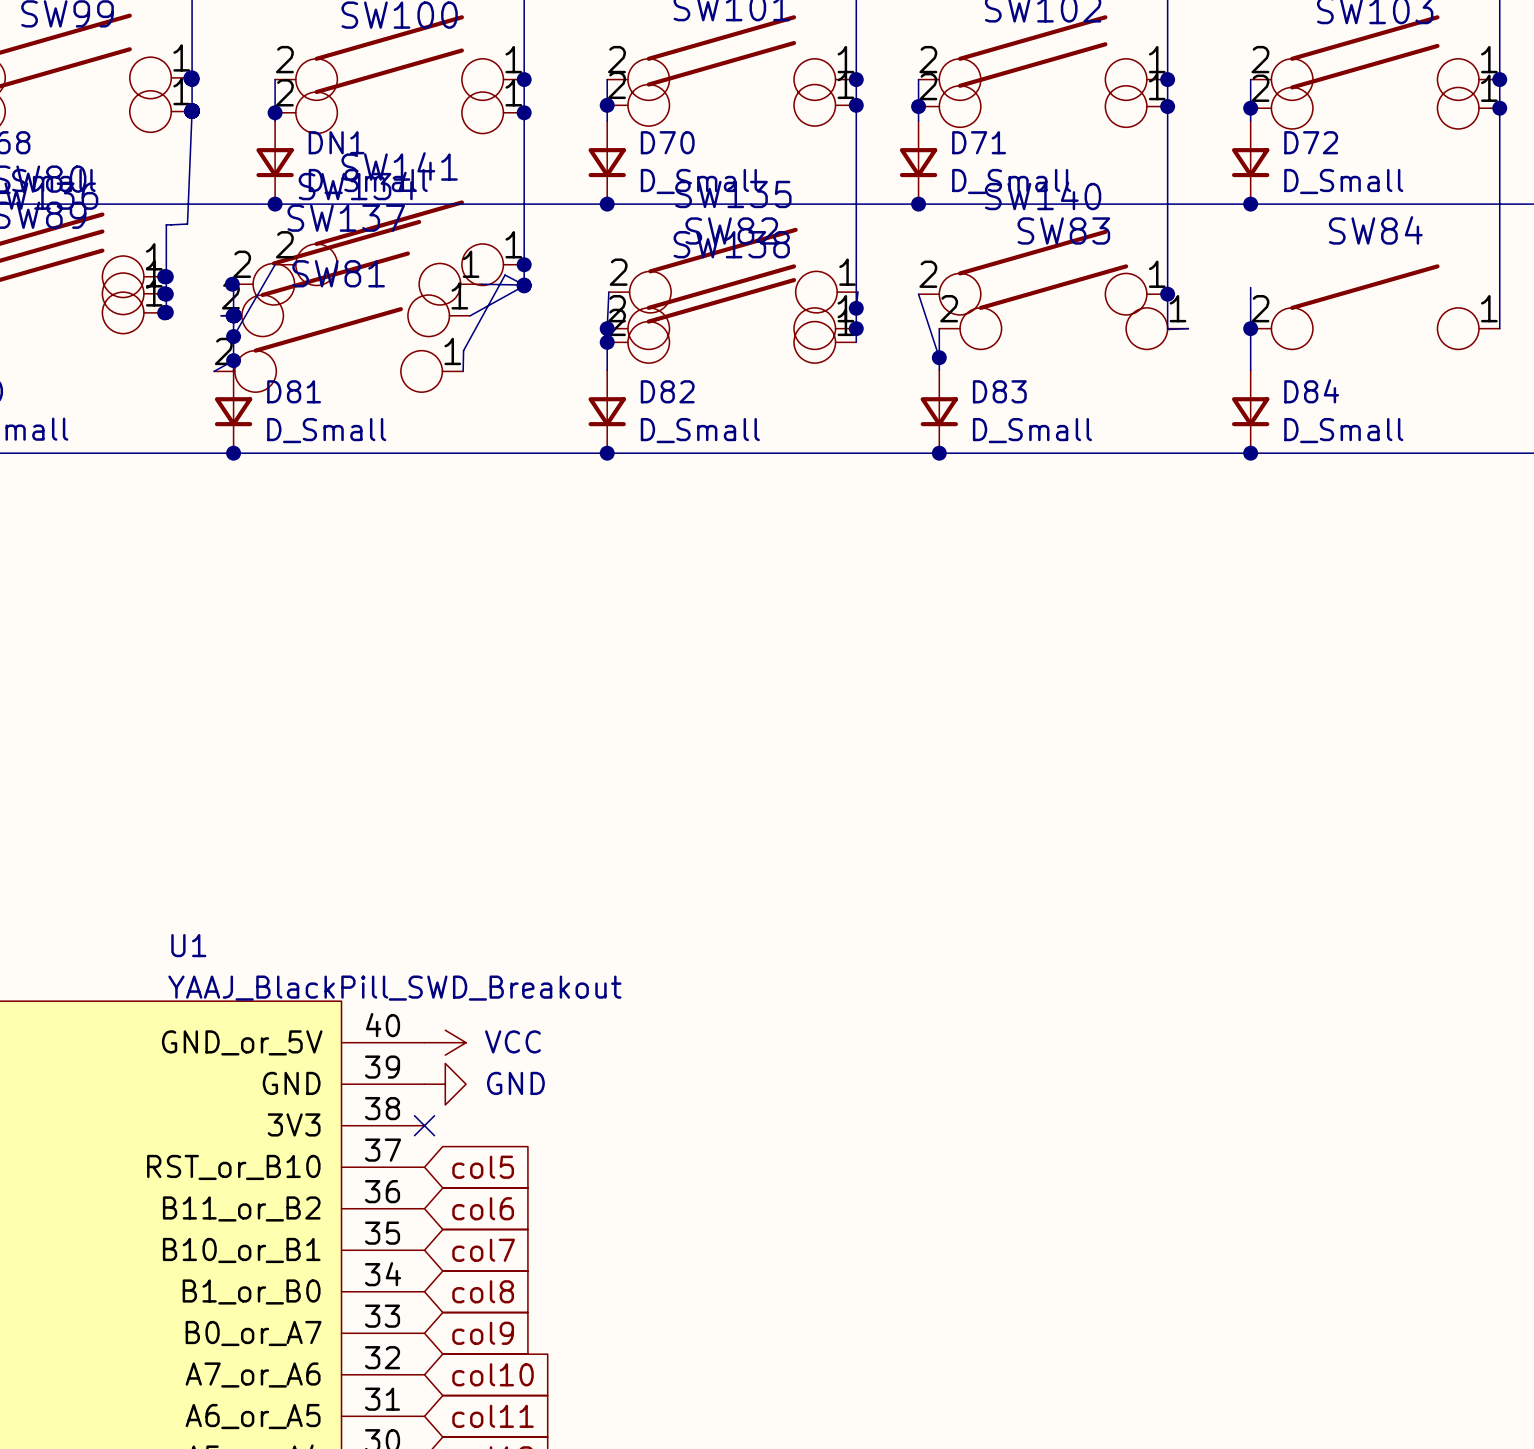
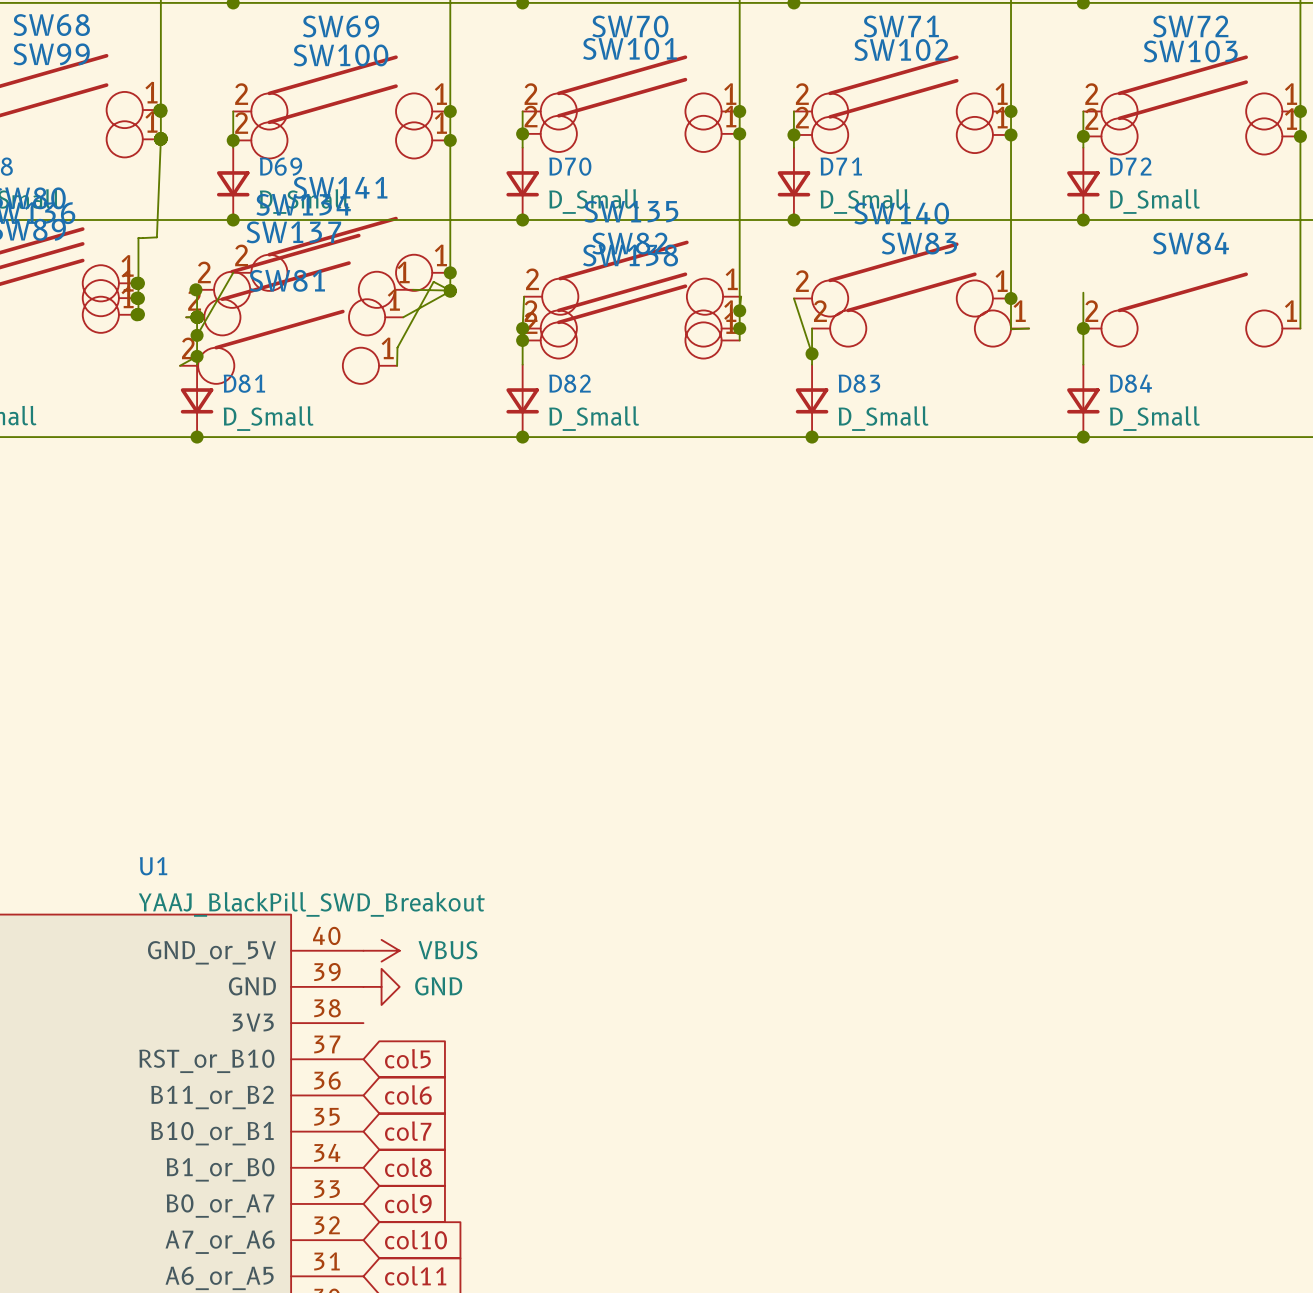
DN1 name: DN1 (336, 142) -> D69 (280, 166)
power symbol: VCC (445, 1042) -> VBUS (381, 950)
no-connect mark: (424, 1125) -> none

